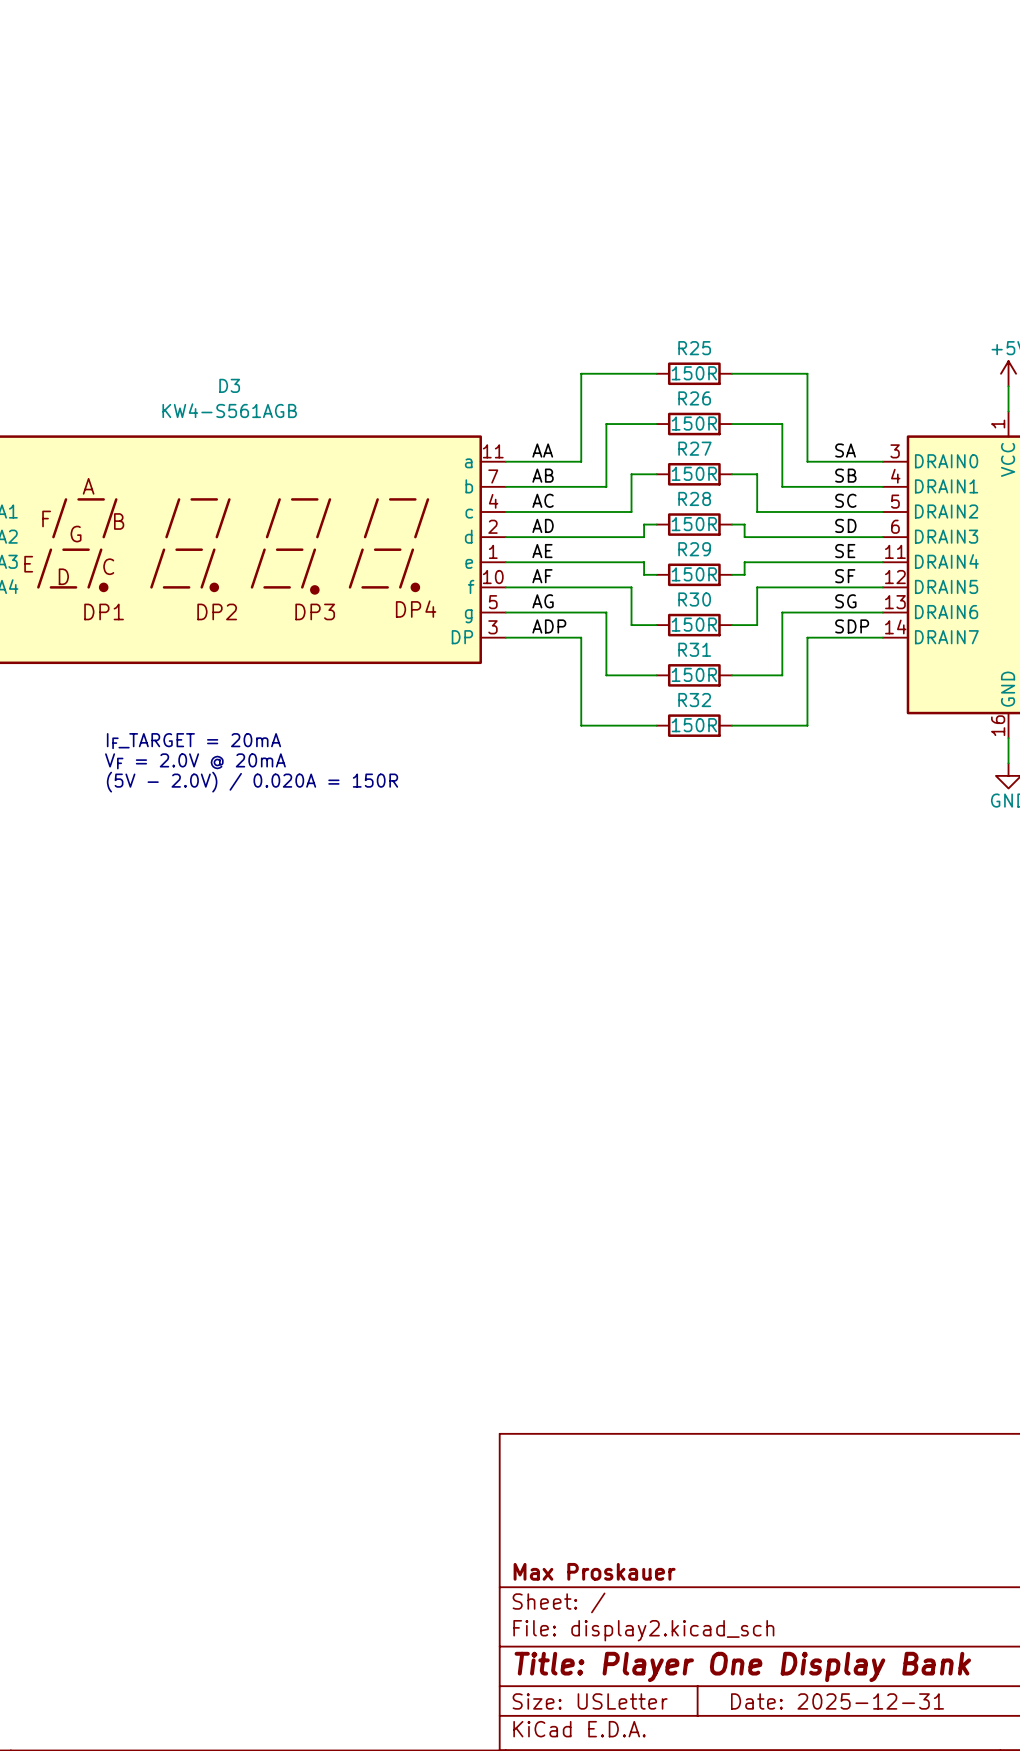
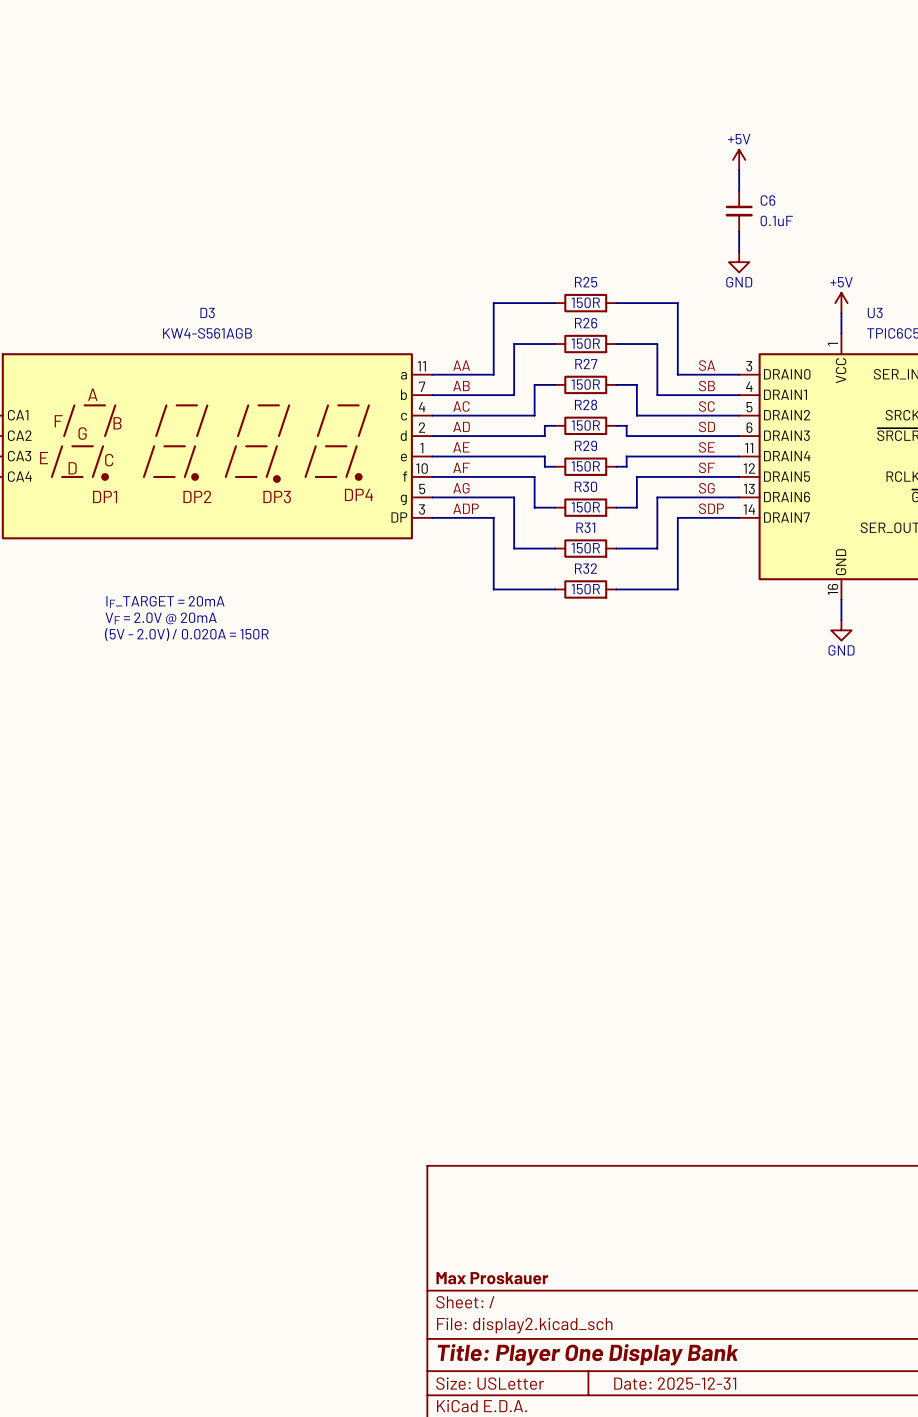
power symbol: none -> +5V (739, 159)
wire: none -> (739, 170) (739, 190)
C6: none -> 0.1uF (739, 211)
wire: none -> (739, 231) (739, 251)
power symbol: none -> GND (739, 262)

